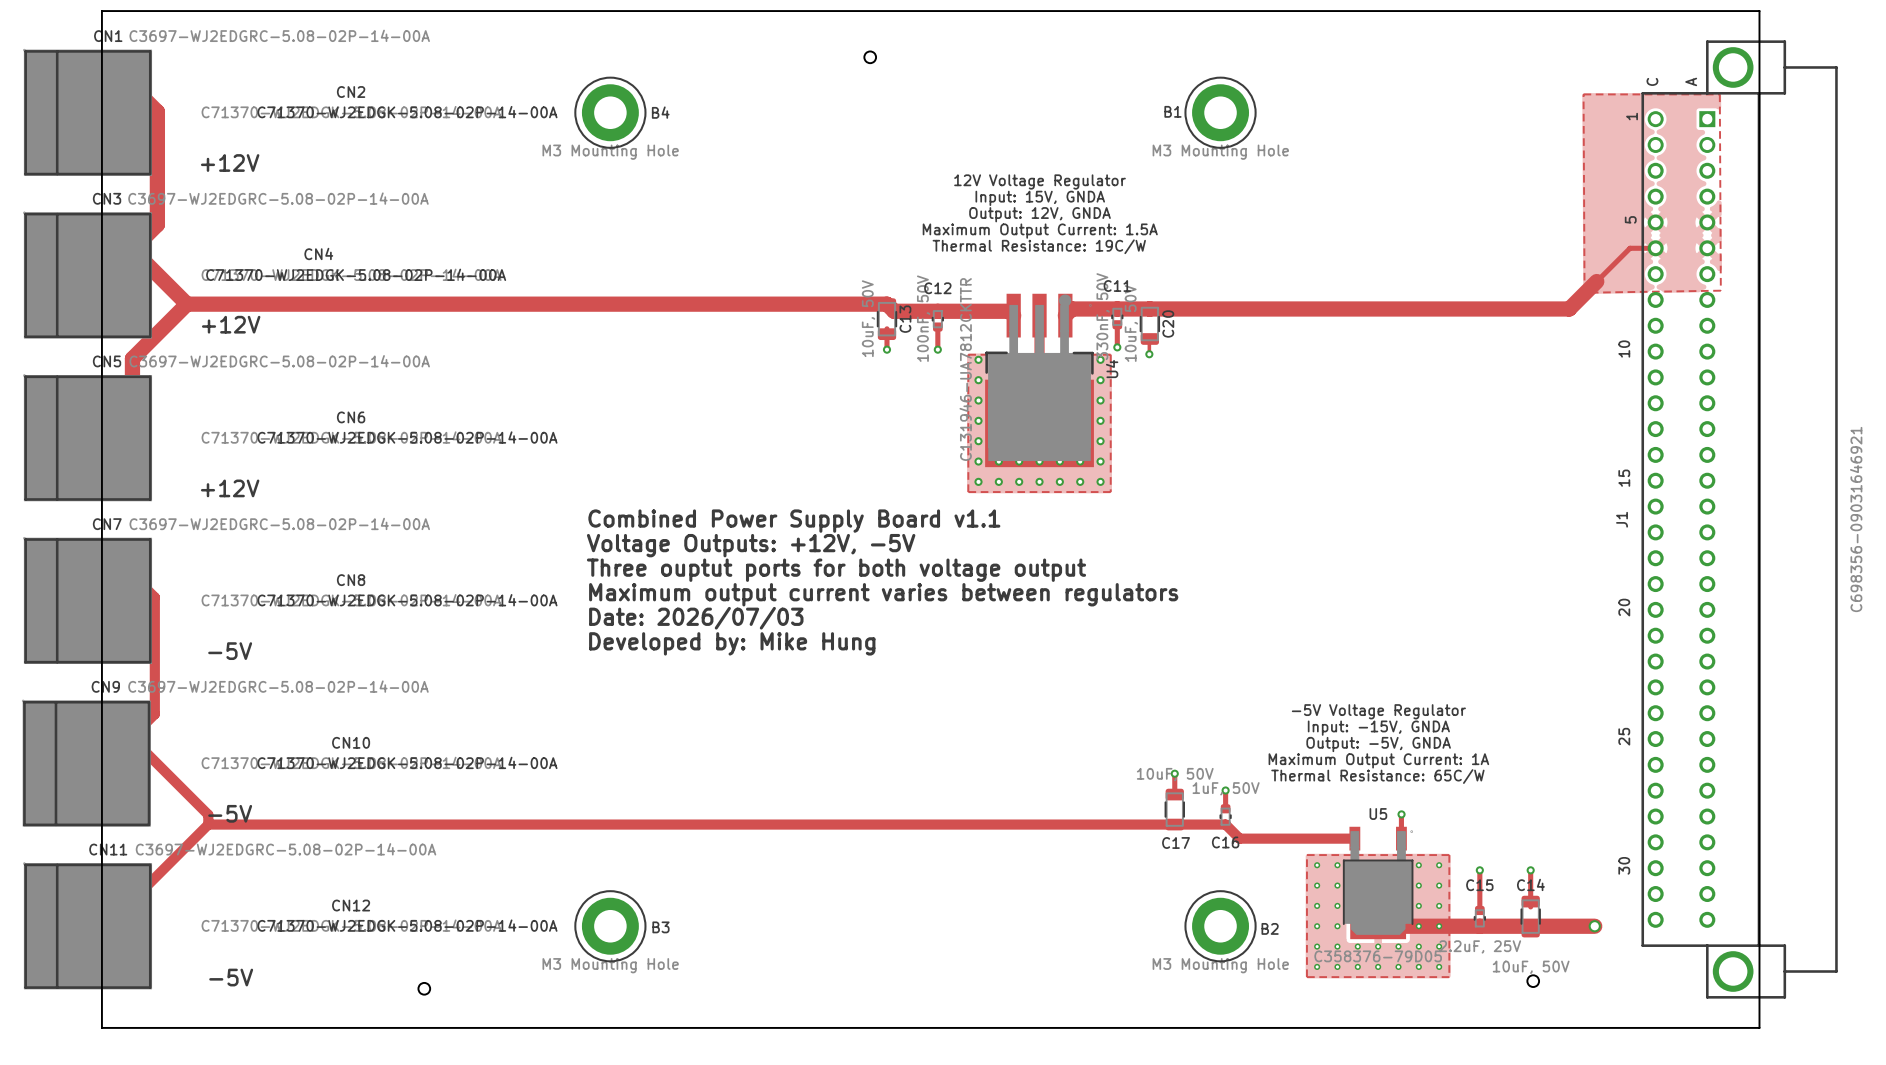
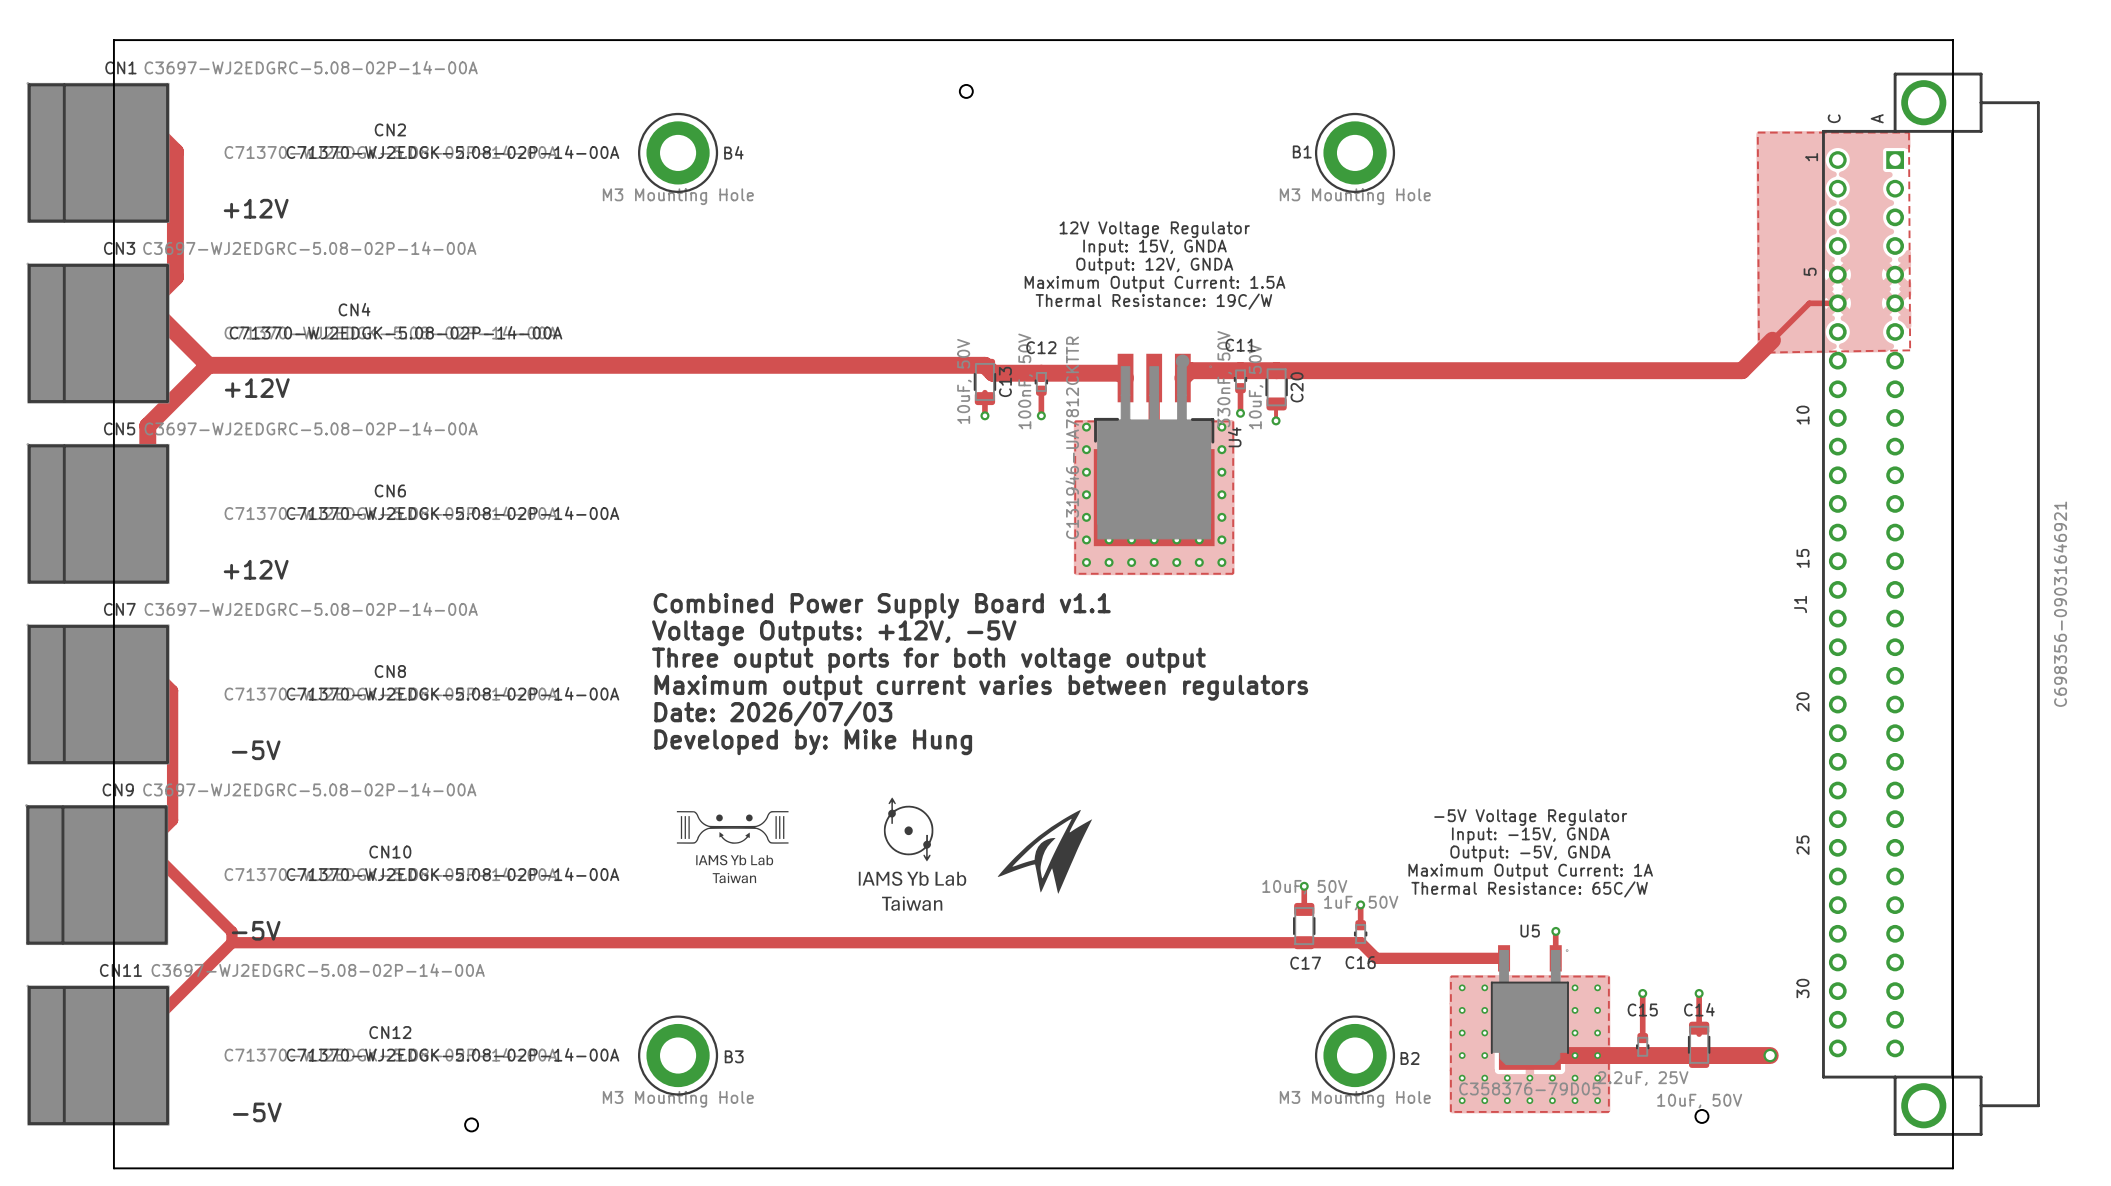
drawing: none -> [858, 797, 967, 911]
drawing: none -> [997, 809, 1093, 894]
drawing: none -> [676, 811, 789, 884]

